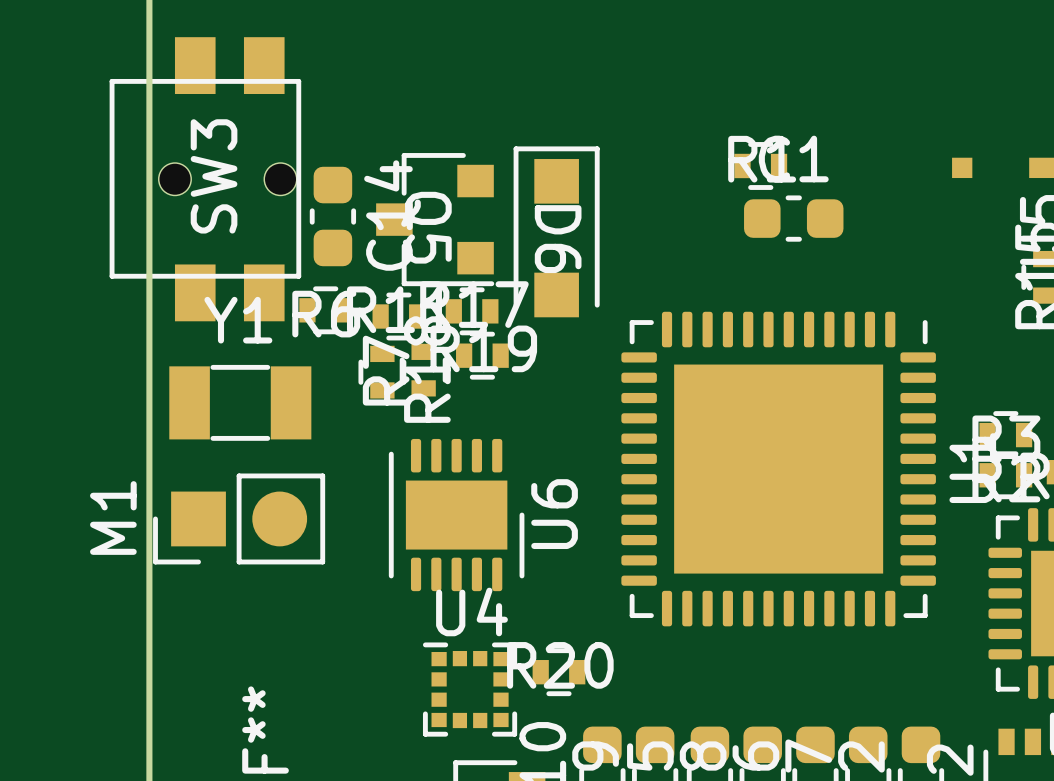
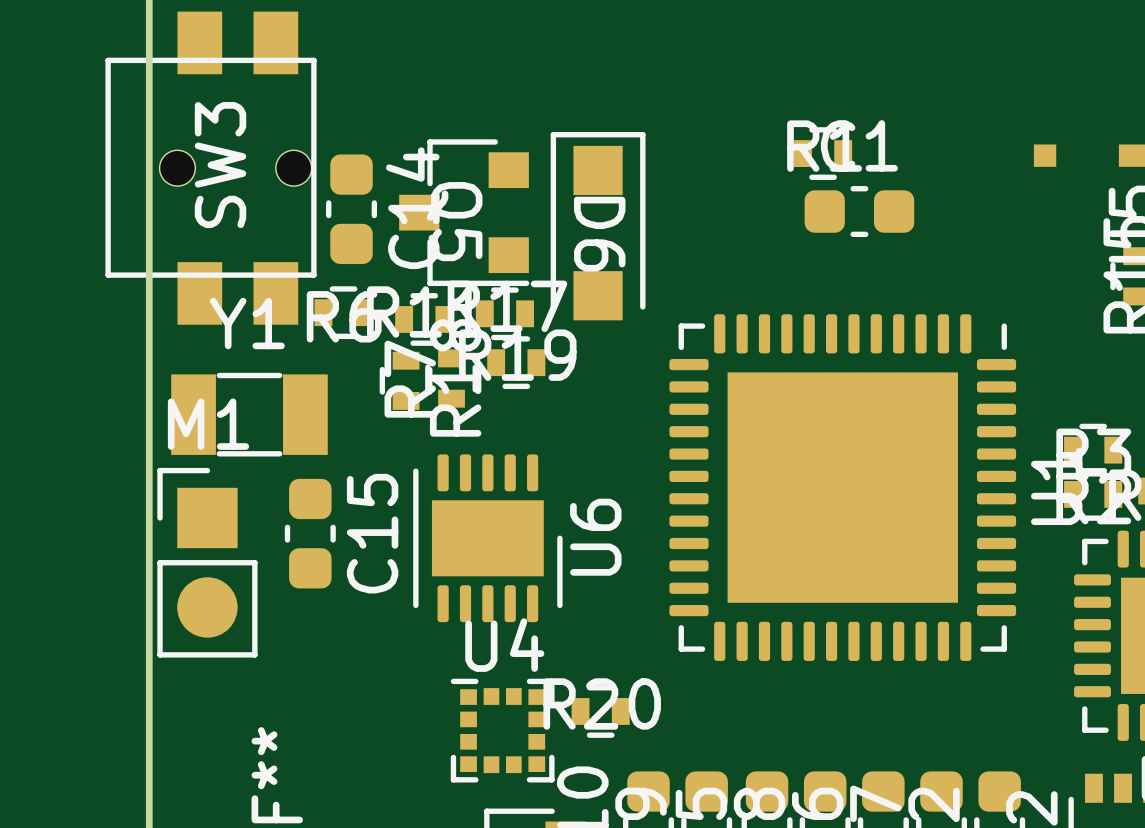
C15: none -> (310, 533)
M1 rotation: 0° (239, 518) -> 90° clockwise (207, 562)

